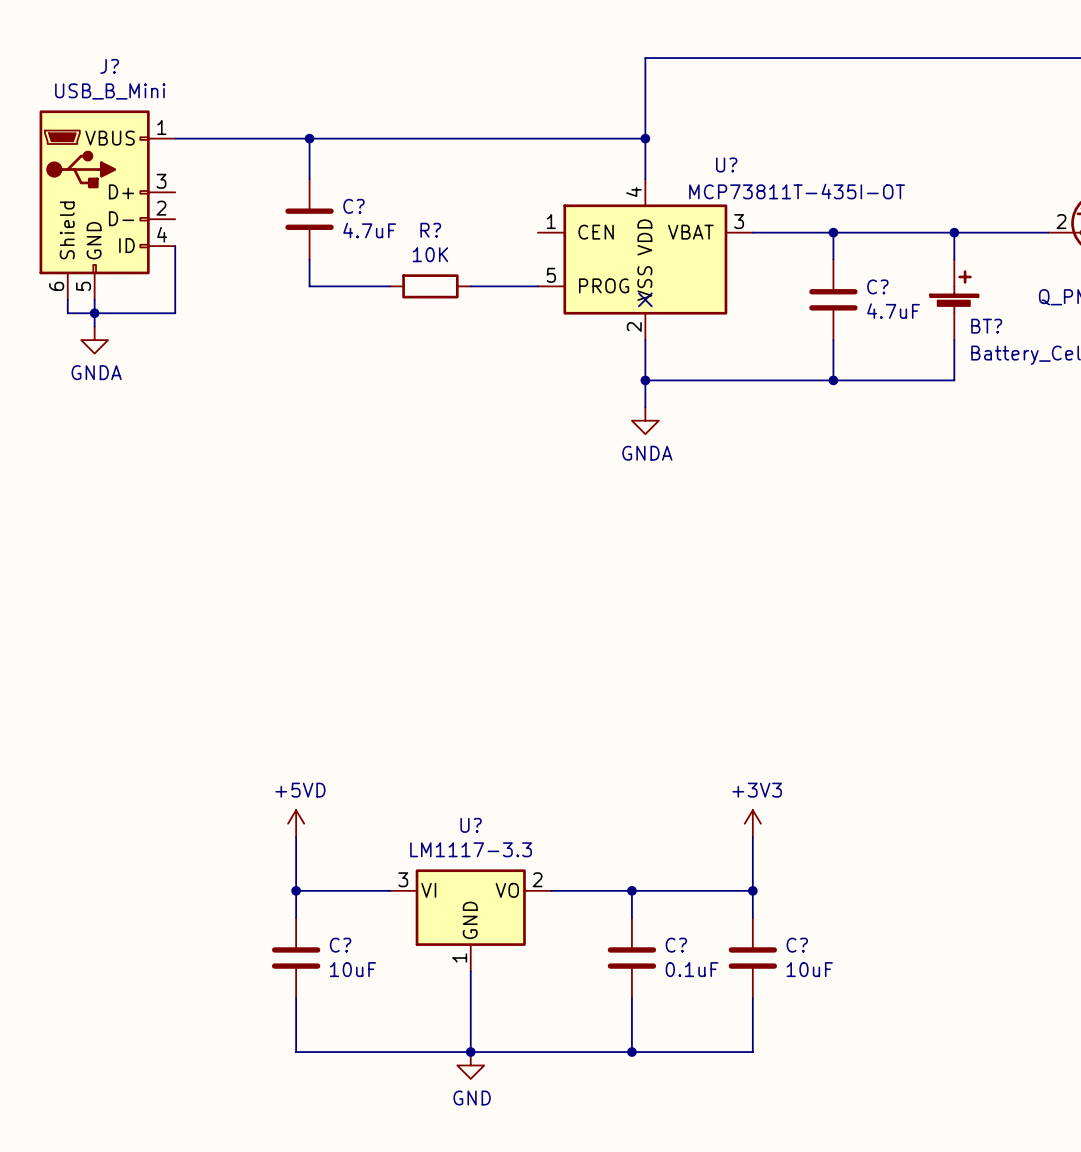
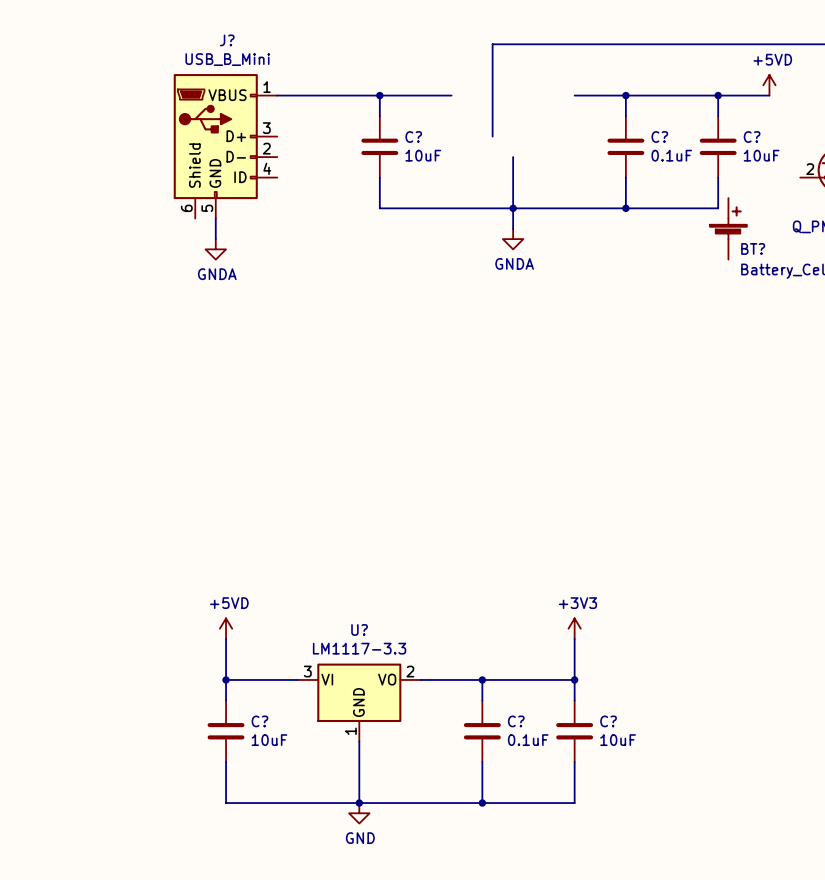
power symbol: none -> +5VD (769, 85)
wire: none -> (277, 95) (451, 95)
wire: none -> (379, 95) (379, 116)
junction: none -> (379, 95)
wire: none -> (574, 95) (769, 95)
junction: none -> (625, 95)
junction: none -> (718, 95)
wire: (175, 138) (645, 138) -> none
junction: (309, 138) -> none
junction: (645, 138) -> none
C?: none -> 10uF (379, 146)
C?: none -> 0.1uF (625, 146)
C?: none -> 10uF (718, 146)
J? position: (107, 205) -> (225, 146)
C?: 4.7uF (309, 219) -> none
wire: none -> (379, 177) (379, 208) (718, 208) (718, 177)
wire: (752, 232) (1048, 232) -> none
wire: (833, 232) (833, 259) -> (625, 95) (625, 116)
junction position: (833, 232) -> (625, 208)
wire: (954, 232) (954, 259) -> (718, 95) (718, 116)
junction: (954, 232) -> none
wire: (175, 246) (175, 313) (67, 313) (67, 299) -> none
wire: (309, 259) (309, 286) (390, 286) -> none
U?: MCP73811T-435I-OT (645, 259) -> none
junction: none -> (513, 208)
R?: 10K (430, 286) -> none
wire: (470, 286) (537, 286) -> none
wire: (94, 299) (94, 326) -> (215, 218) (215, 239)
no-connect mark: (645, 299) -> none
C?: 4.7uF (833, 299) -> none
junction: (94, 313) -> none
power symbol: none -> GNDA (215, 249)
power symbol: GNDA (94, 340) -> none
wire: (645, 340) (645, 407) -> none
wire: (833, 340) (833, 380) -> (625, 177) (625, 208)
wire: (954, 340) (954, 380) (645, 380) -> none
junction: (645, 380) -> none
junction: (833, 380) -> none
power symbol position: GNDA (645, 420) -> GNDA (513, 239)

